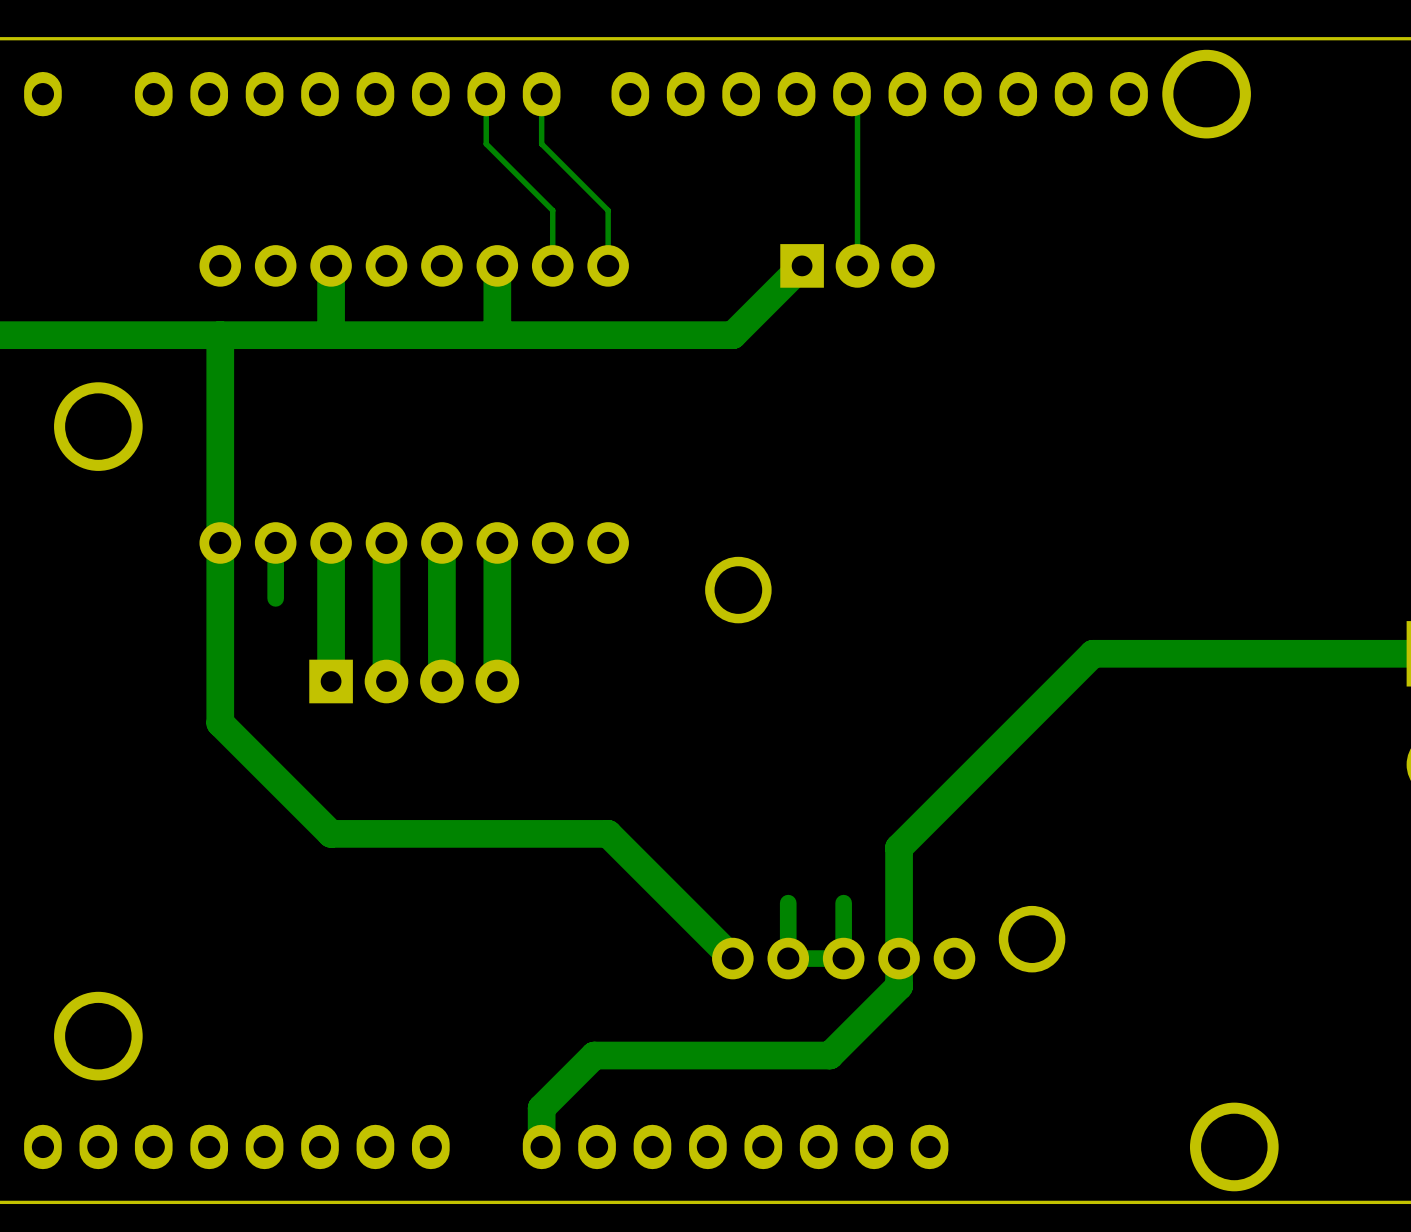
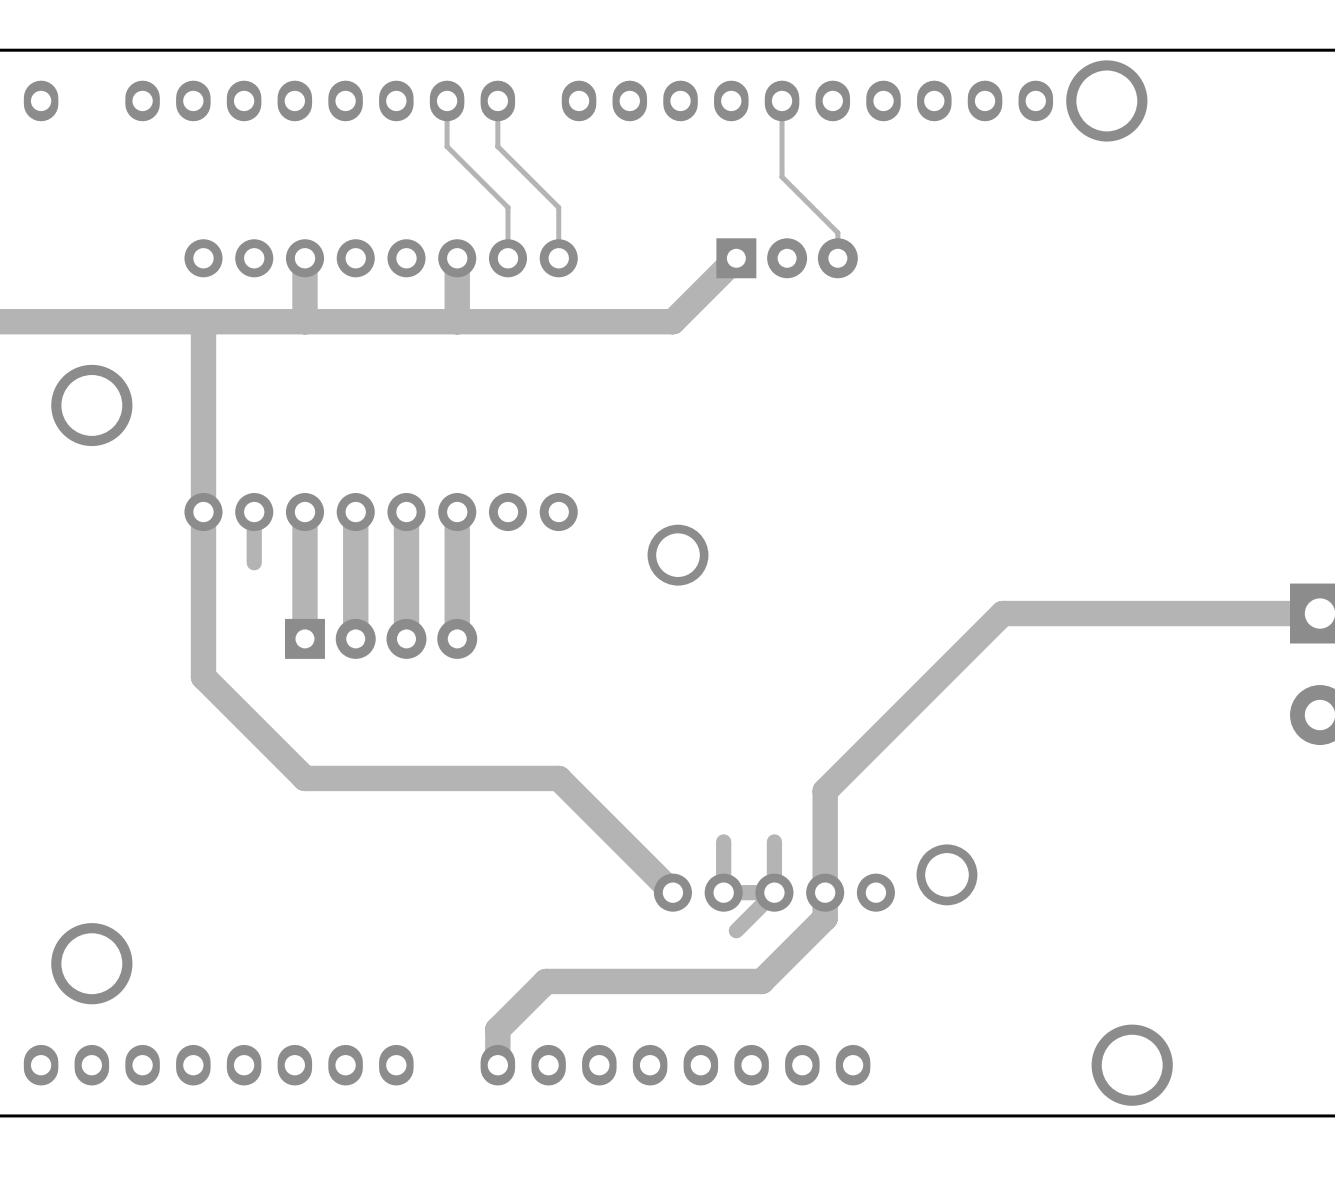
track: (851, 94) (857, 99) (857, 265) -> (782, 100) (782, 177) (837, 232) (837, 258)
track: none -> (774, 892) (736, 930)

